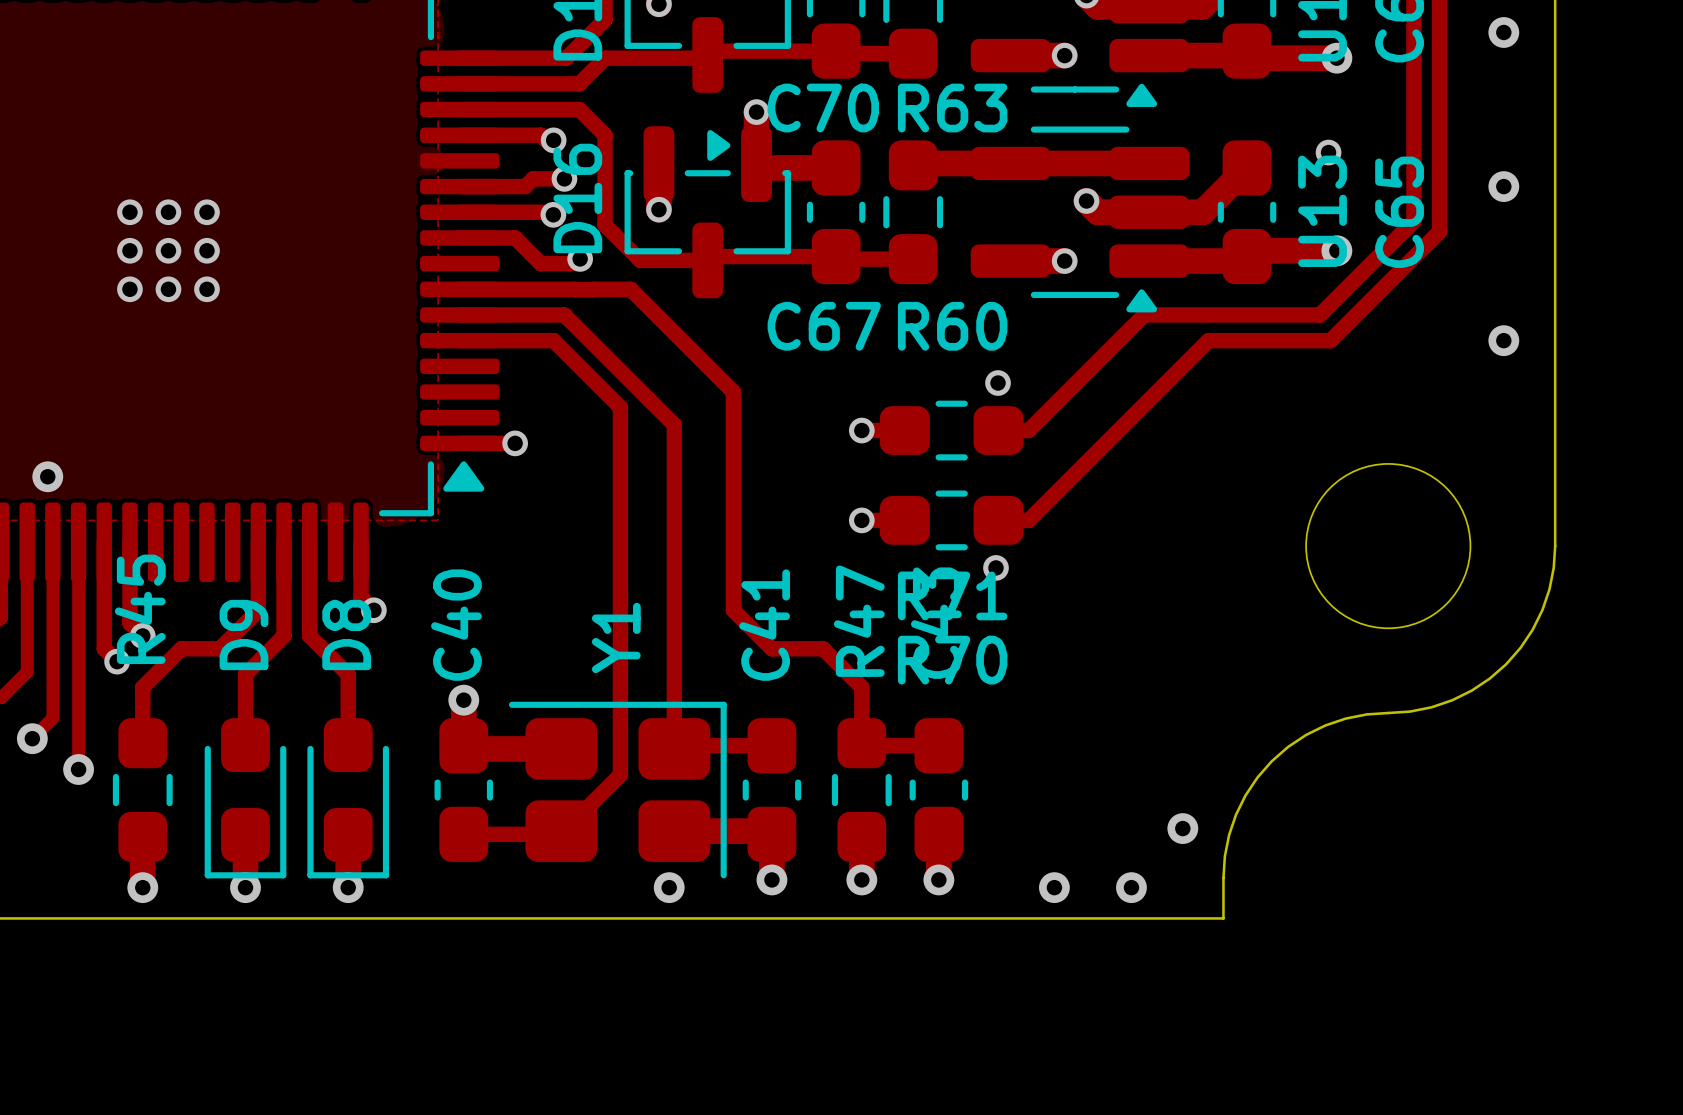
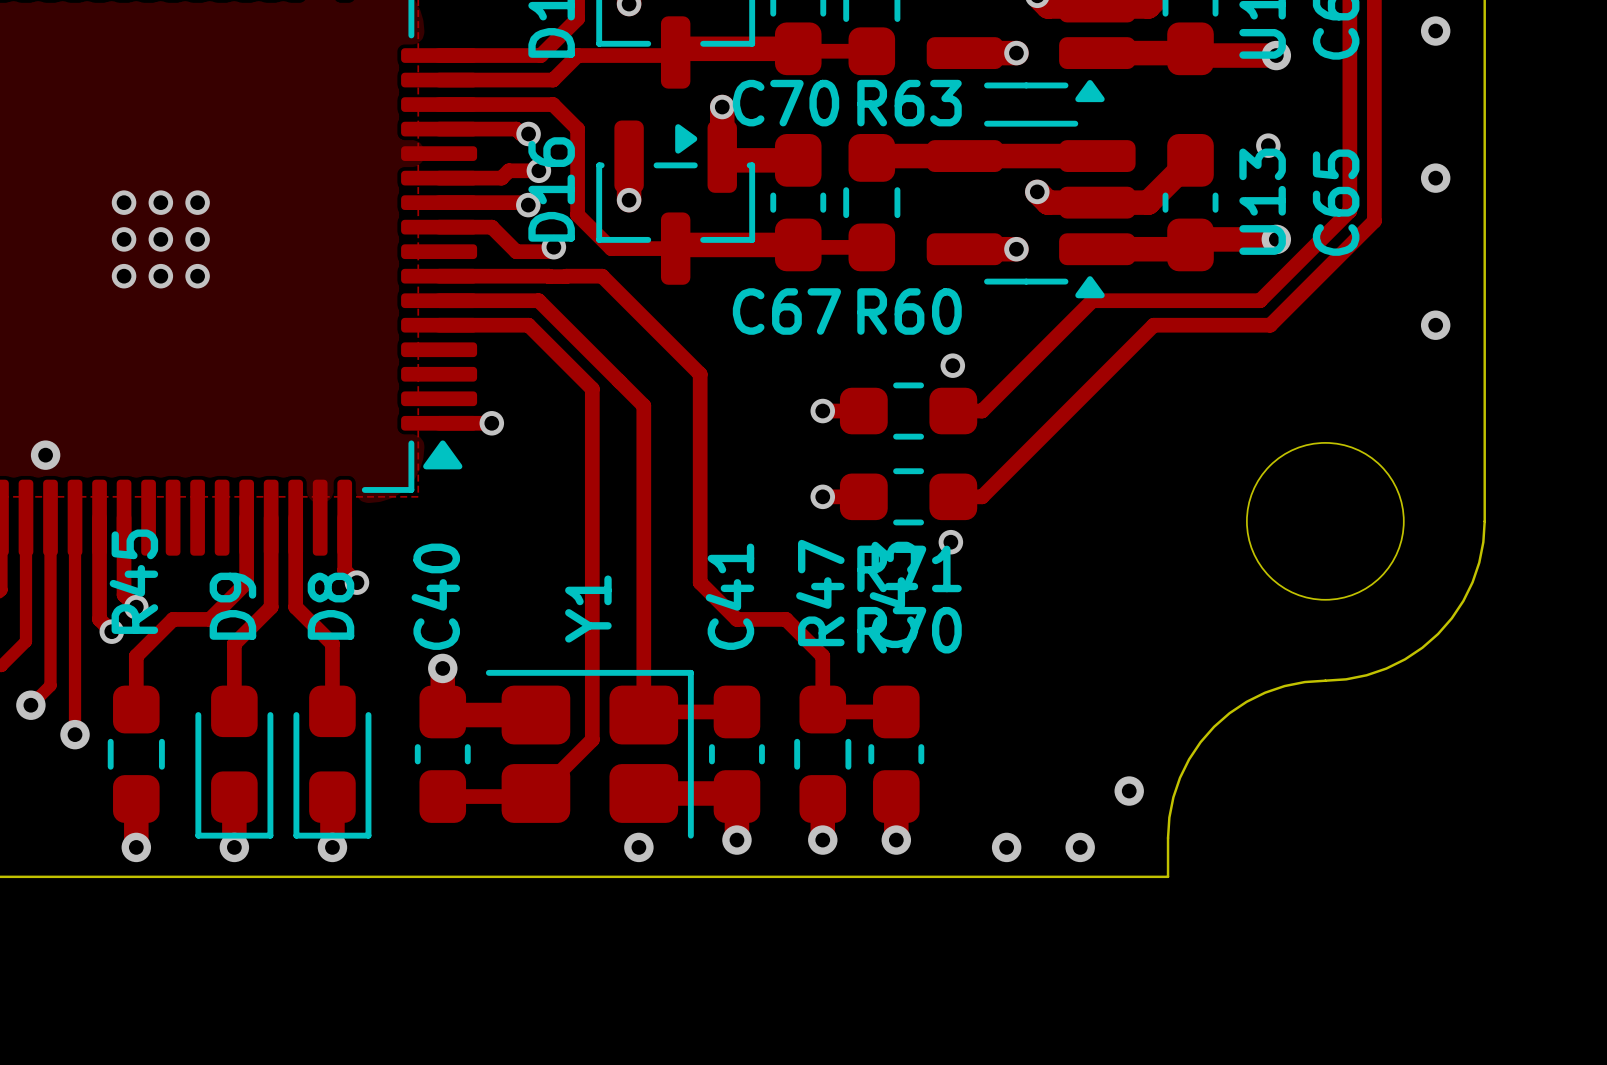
track width: thin (836, 51) (711, 51) (707, 54) -> thick (798, 48) (679, 48) (675, 52)
track width: thin (836, 256) (711, 256) (707, 260) -> thick (798, 244) (679, 244) (675, 248)

